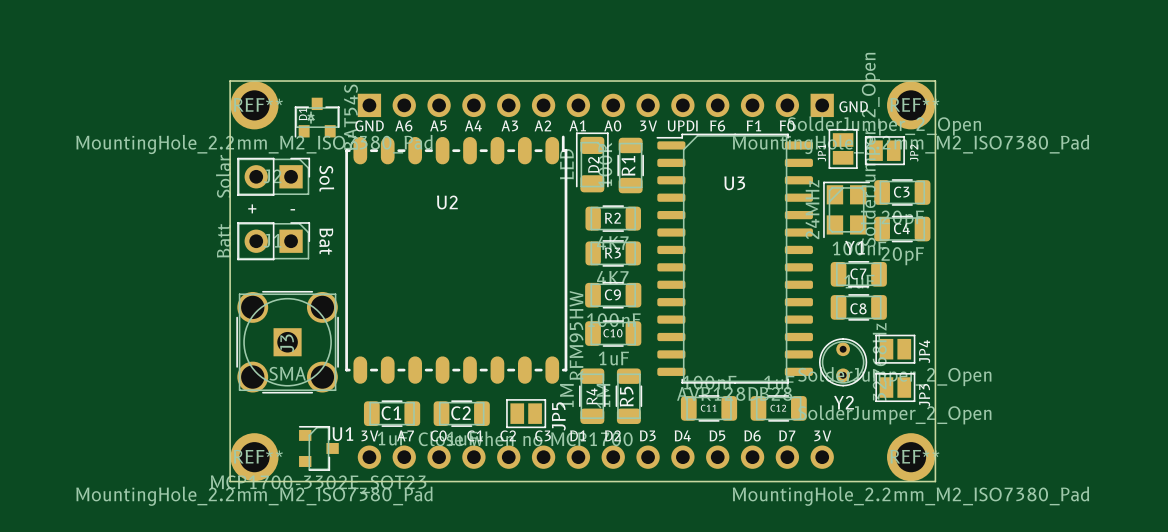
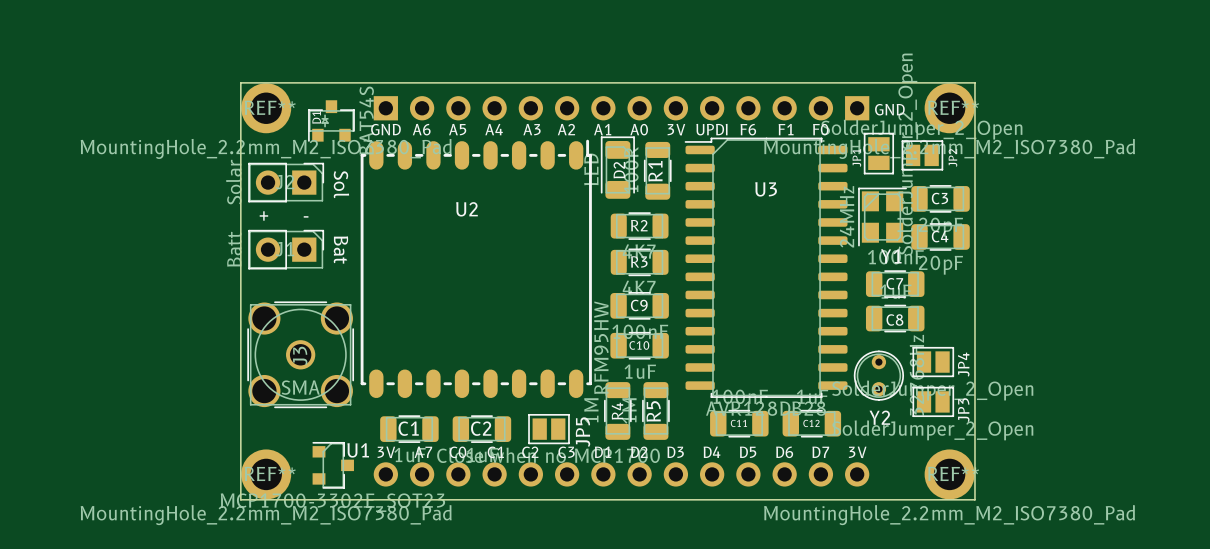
J3 footprint: [236, 290, 339, 394] -> [247, 301, 355, 409]

